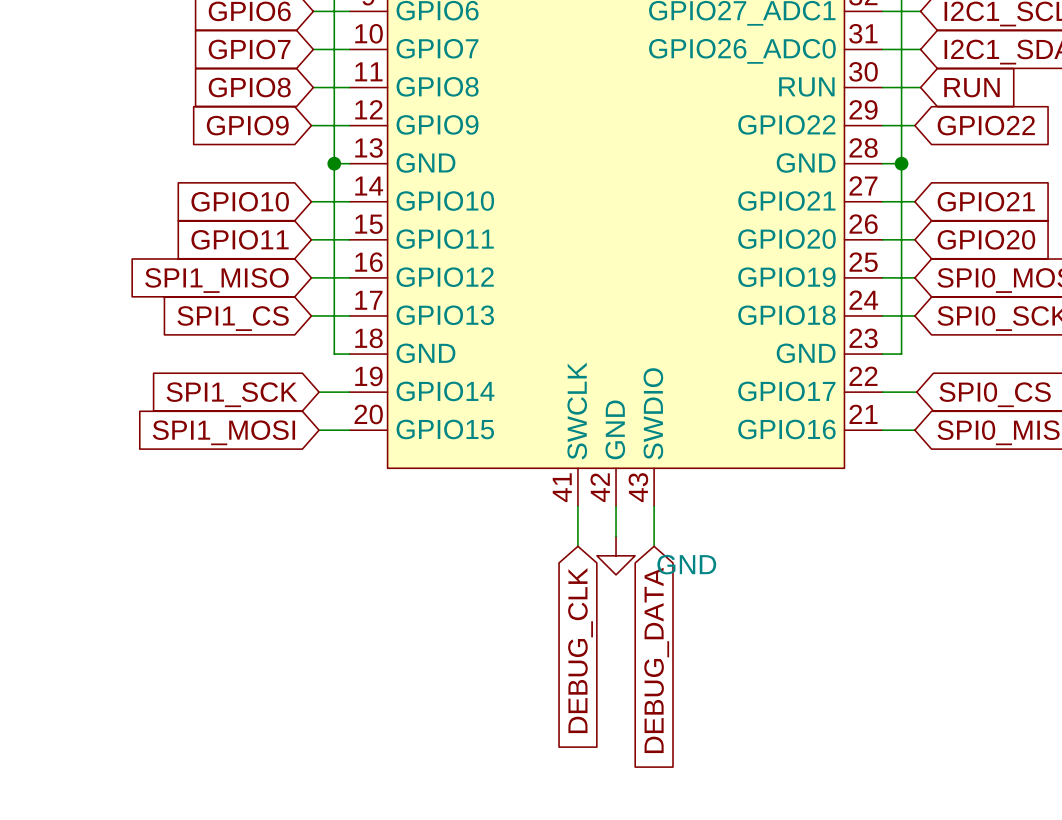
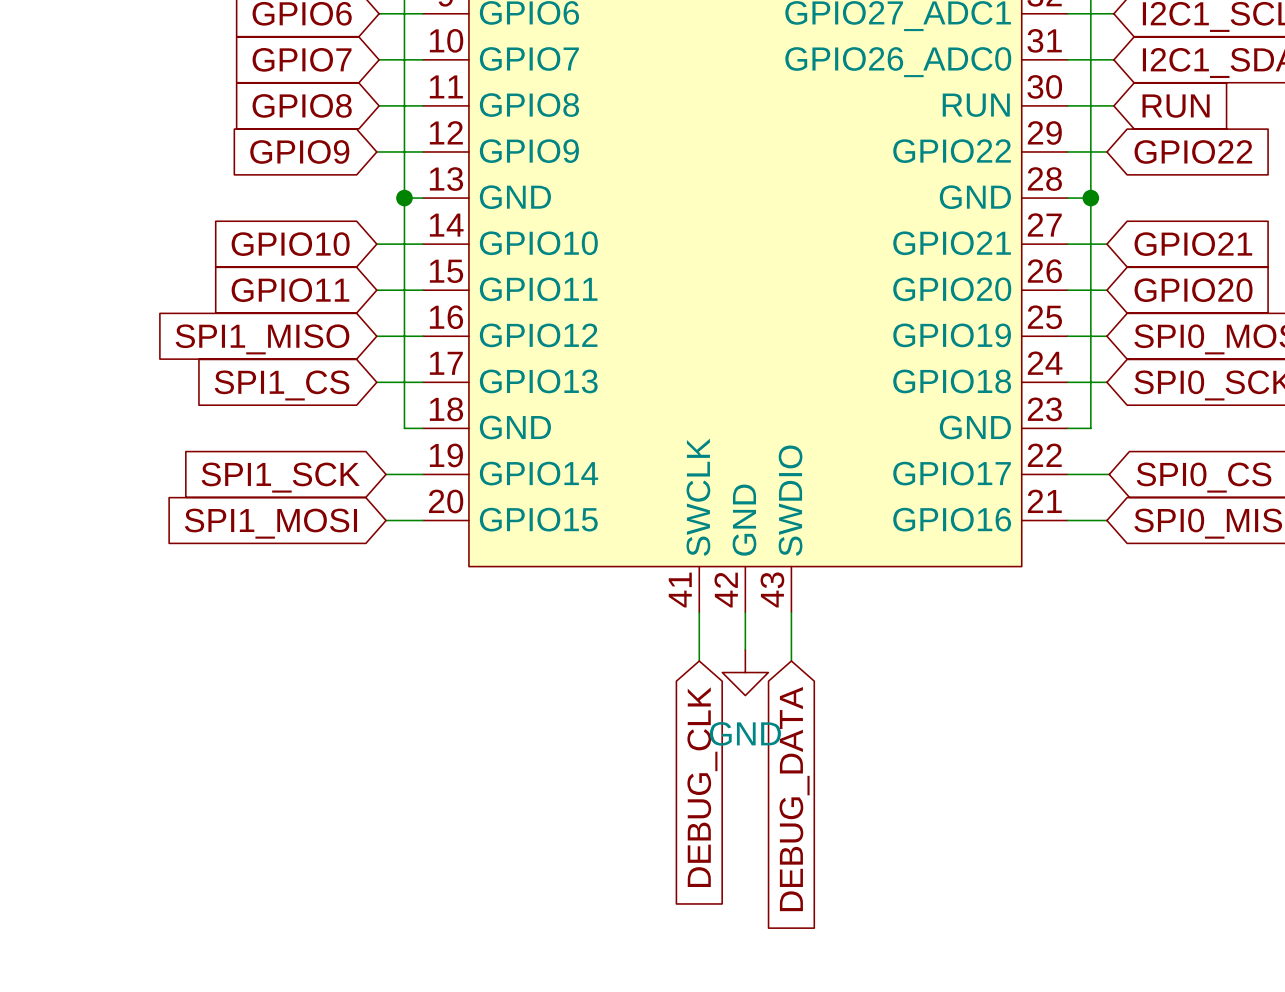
power symbol text position: GND (686, 564) -> GND (745, 733)

